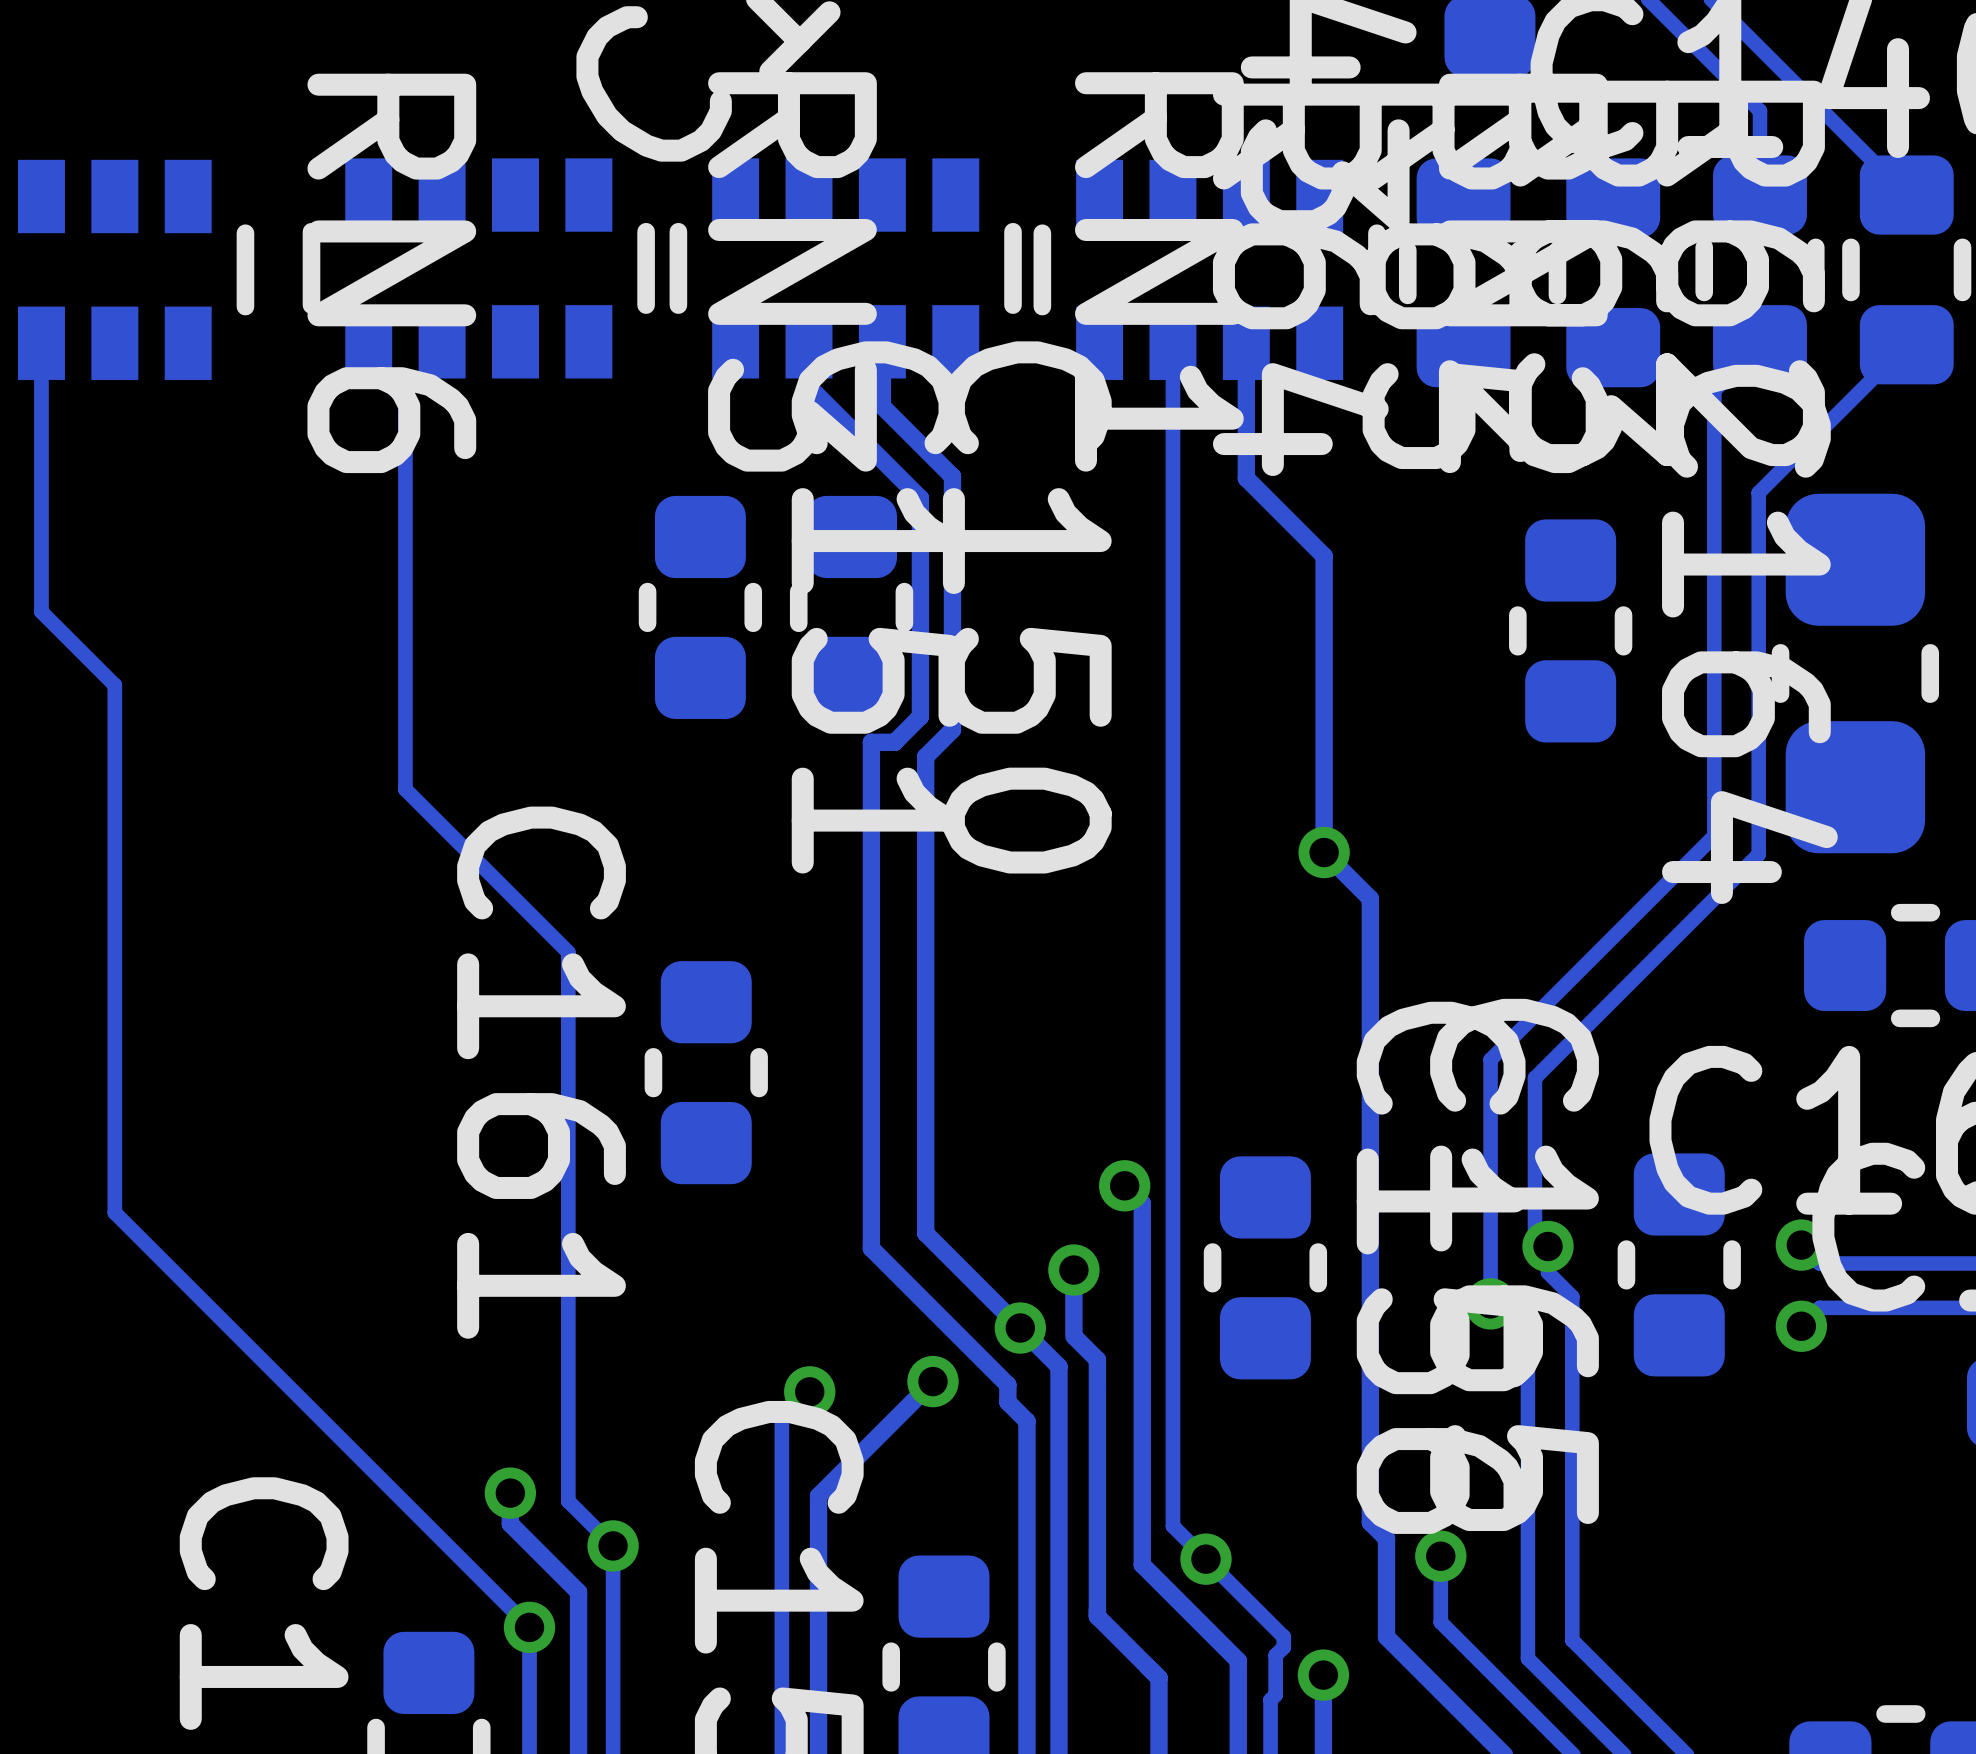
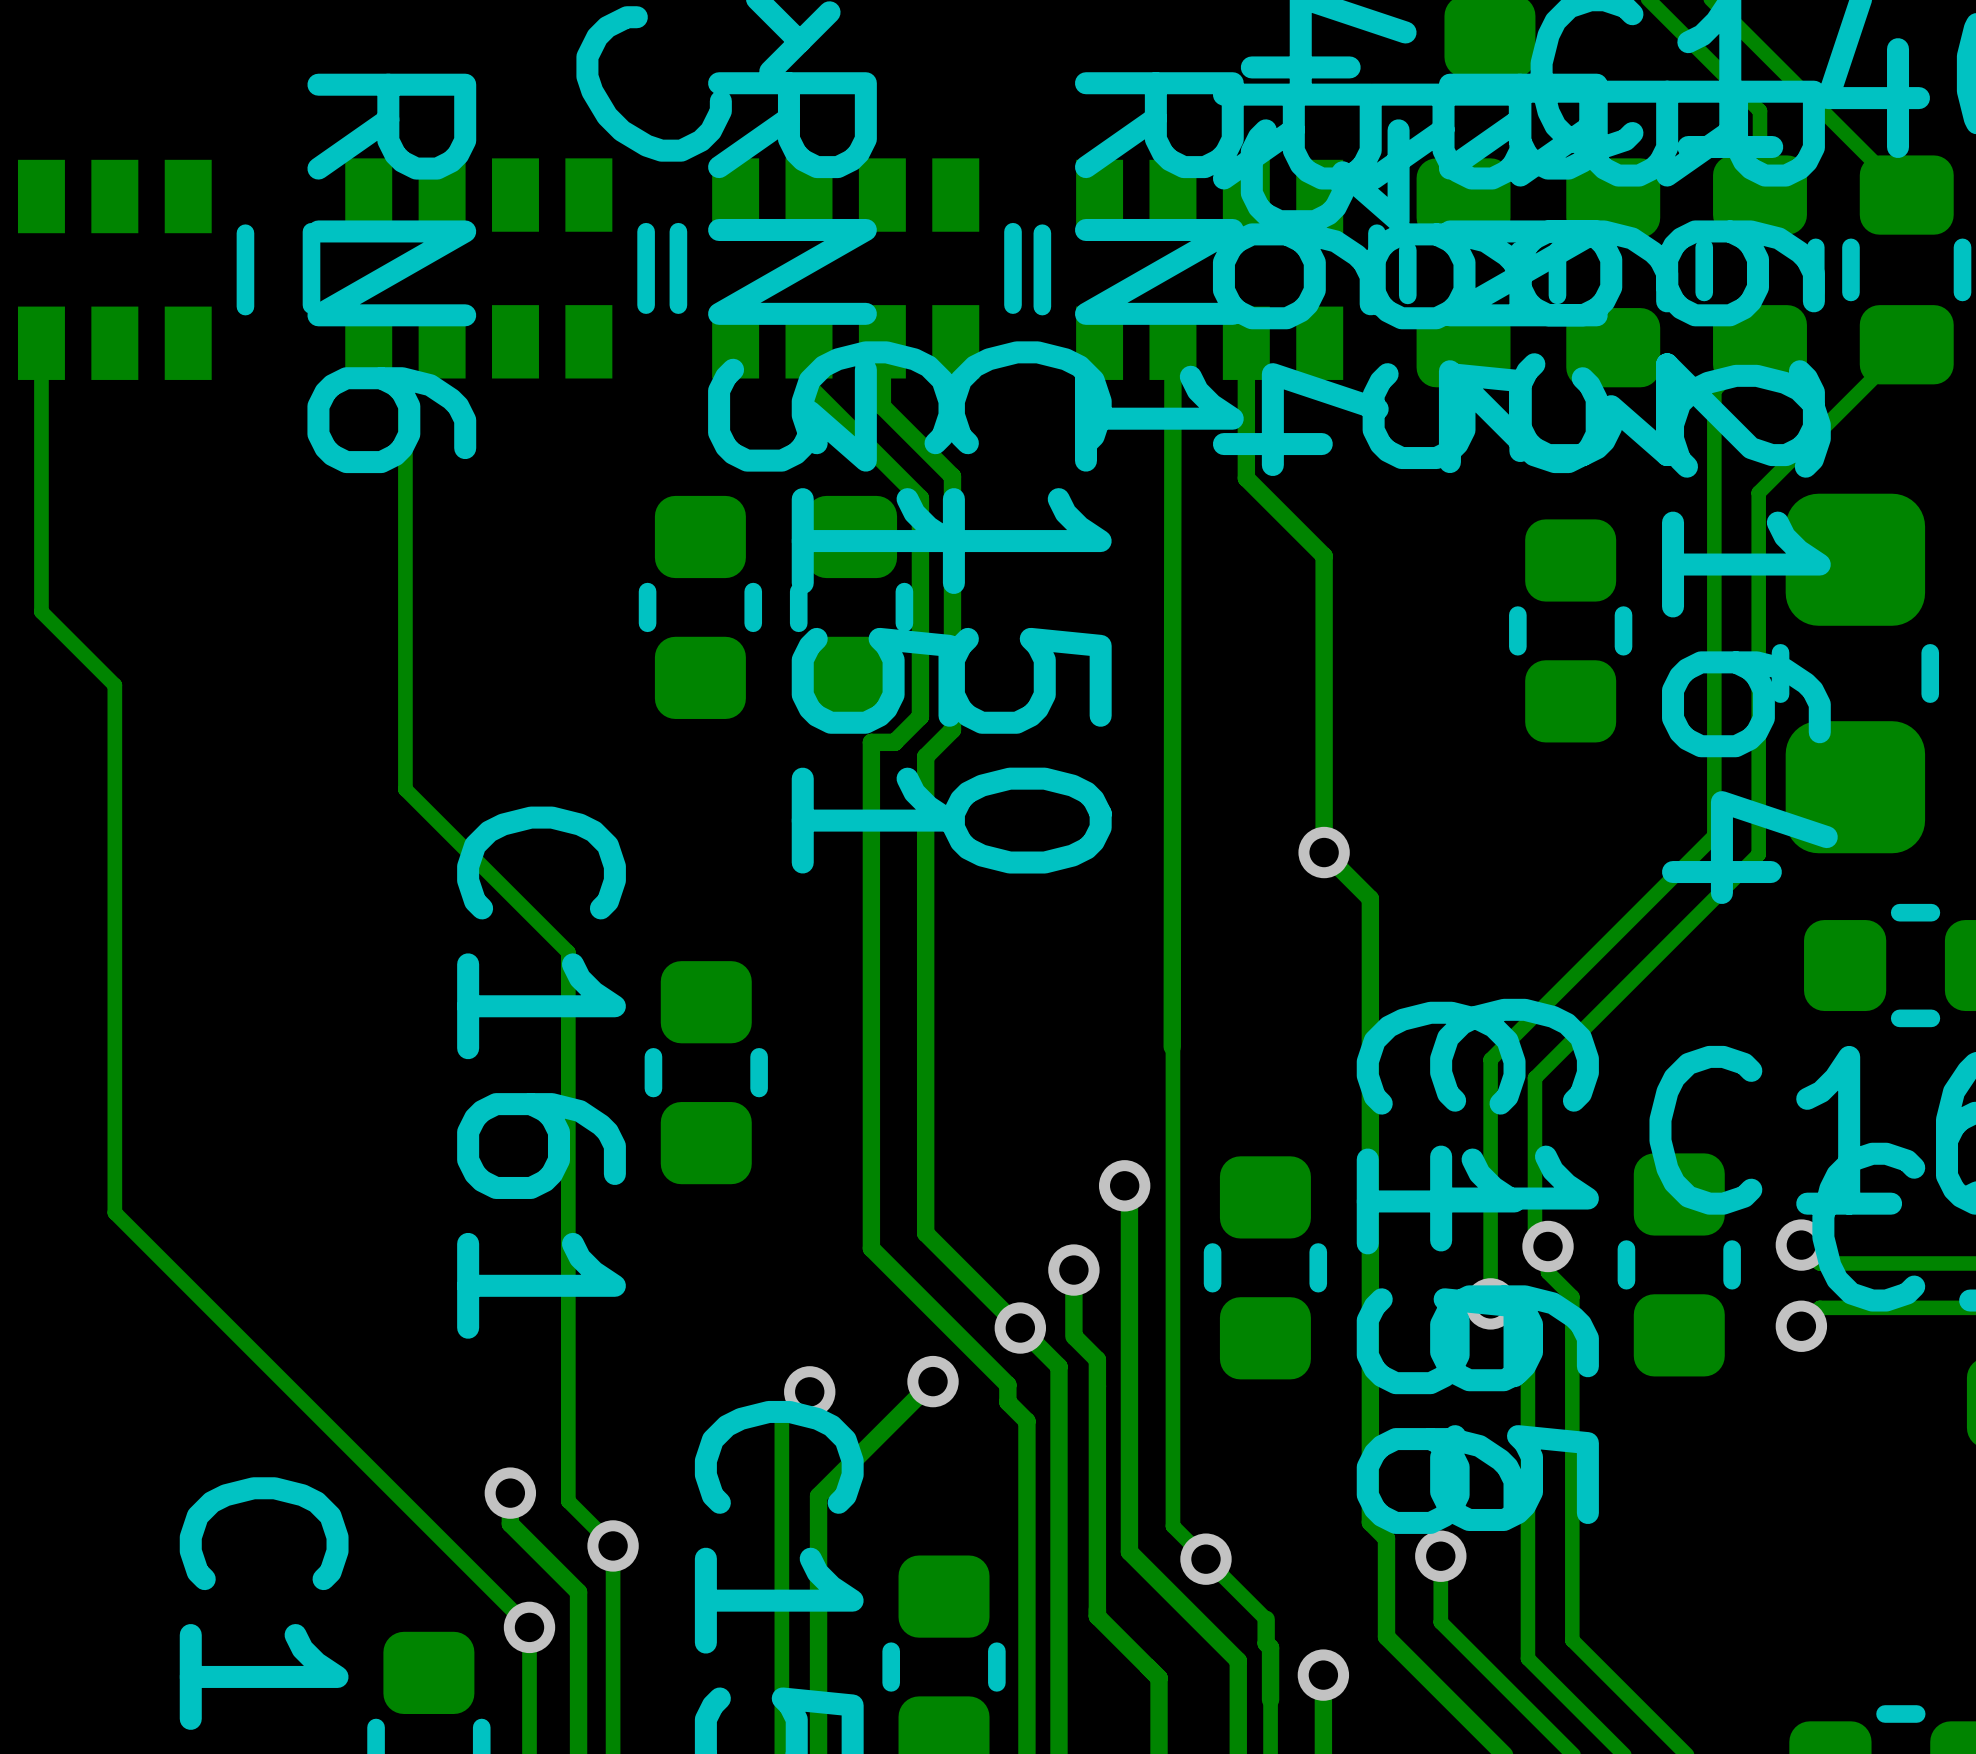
track: (1129, 1190) (1142, 1203) (1142, 1564) -> (1129, 1190) (1129, 1551) (1142, 1564)
track: (1266, 1619) (1283, 1636) (1283, 1647) (1275, 1655) (1275, 1694) (1270, 1699) -> (1266, 1619) (1266, 1643) (1270, 1647) (1270, 1699)

